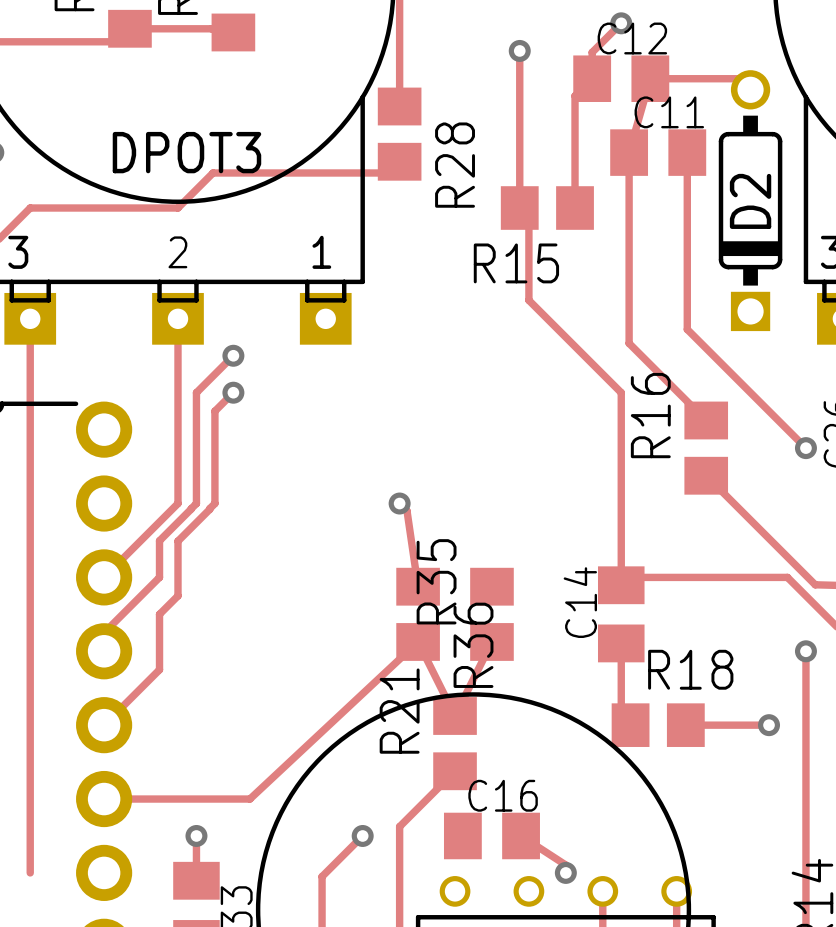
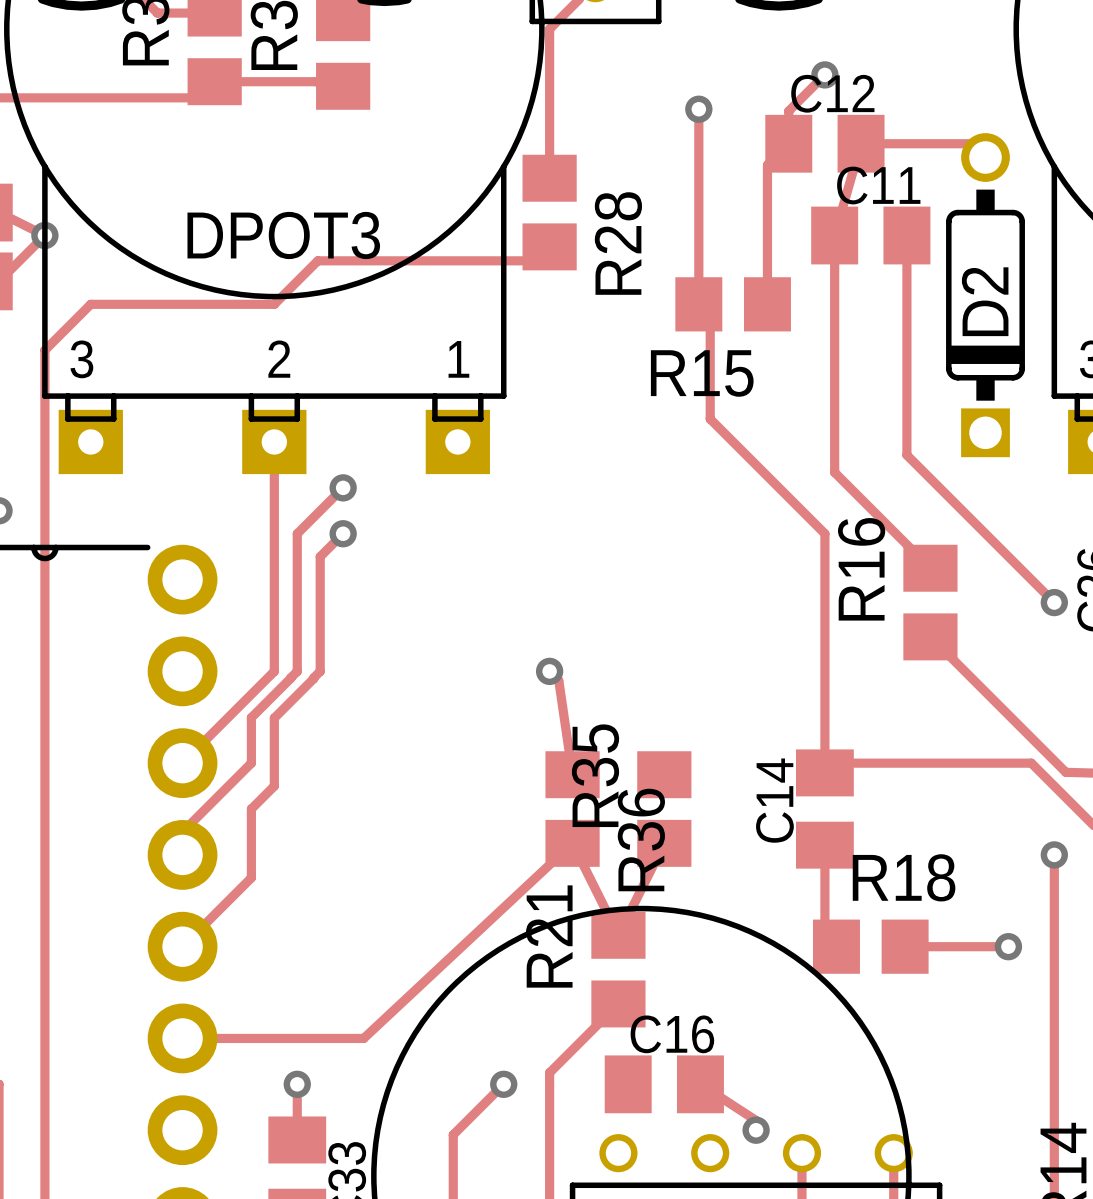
track: (30, 318) (30, 872) -> none

